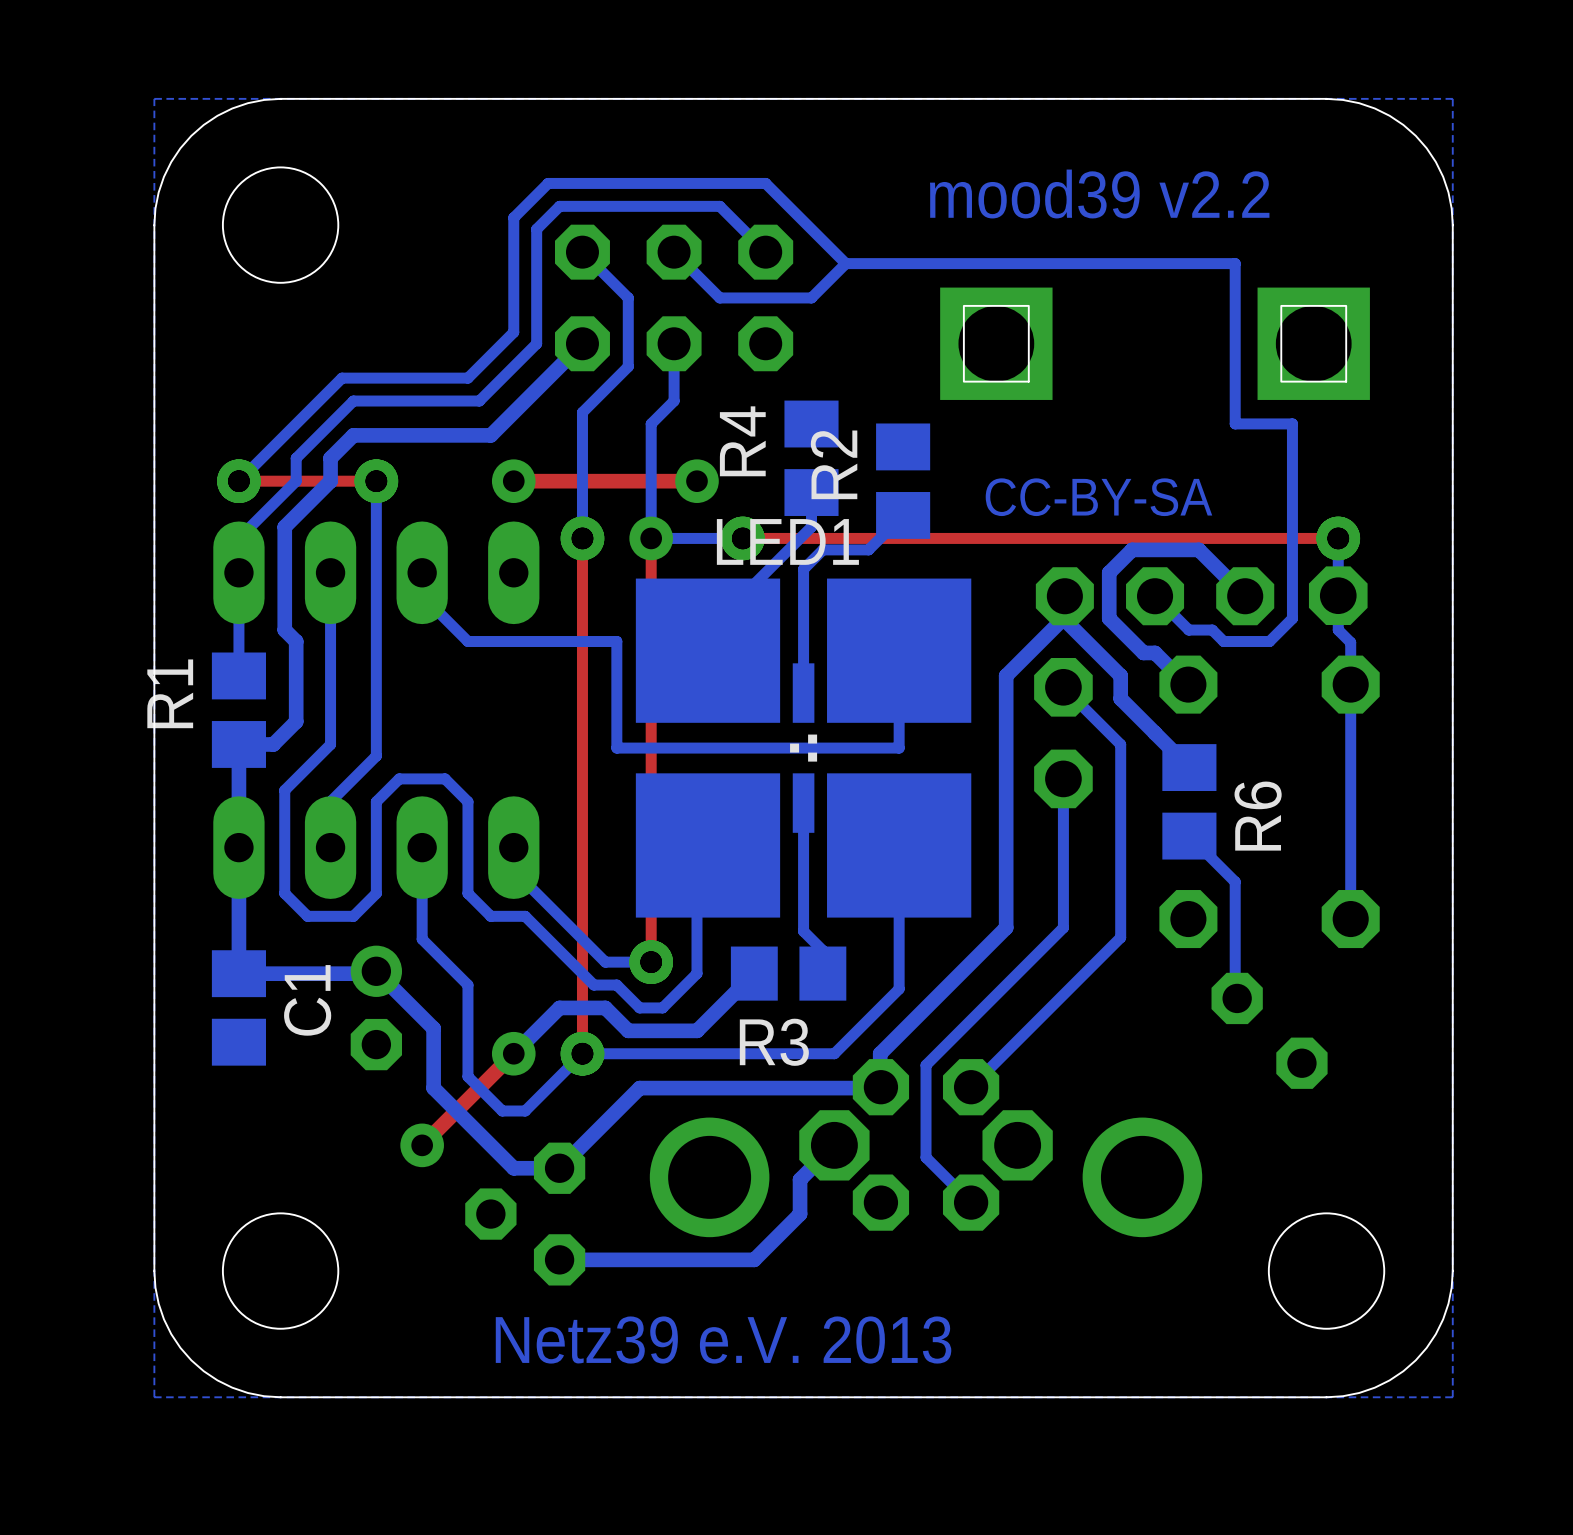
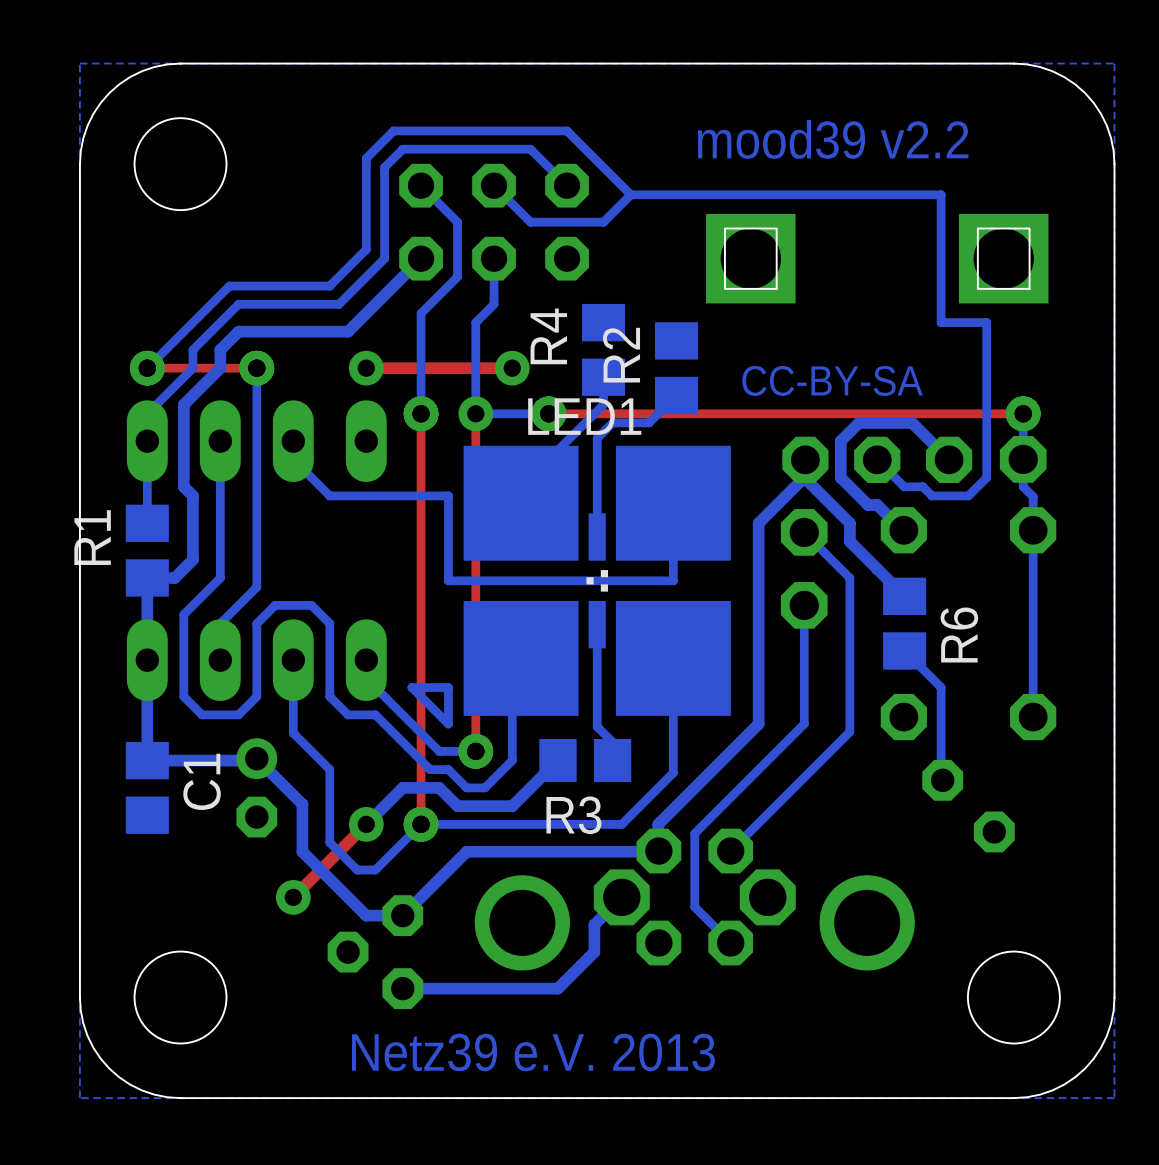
bottom track: none -> (448, 687) (448, 724) (411, 687) (448, 687)

